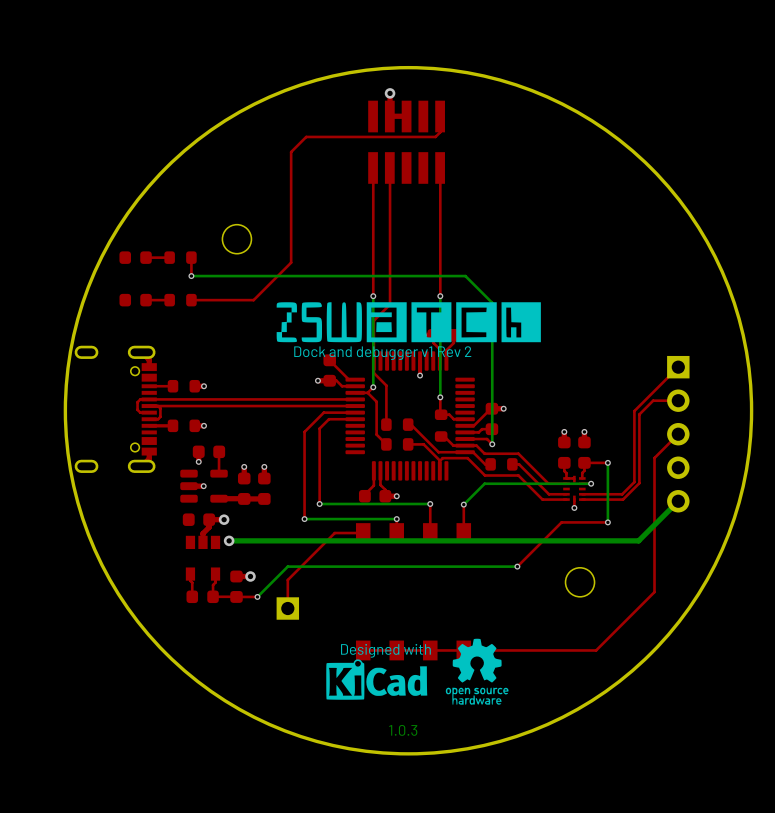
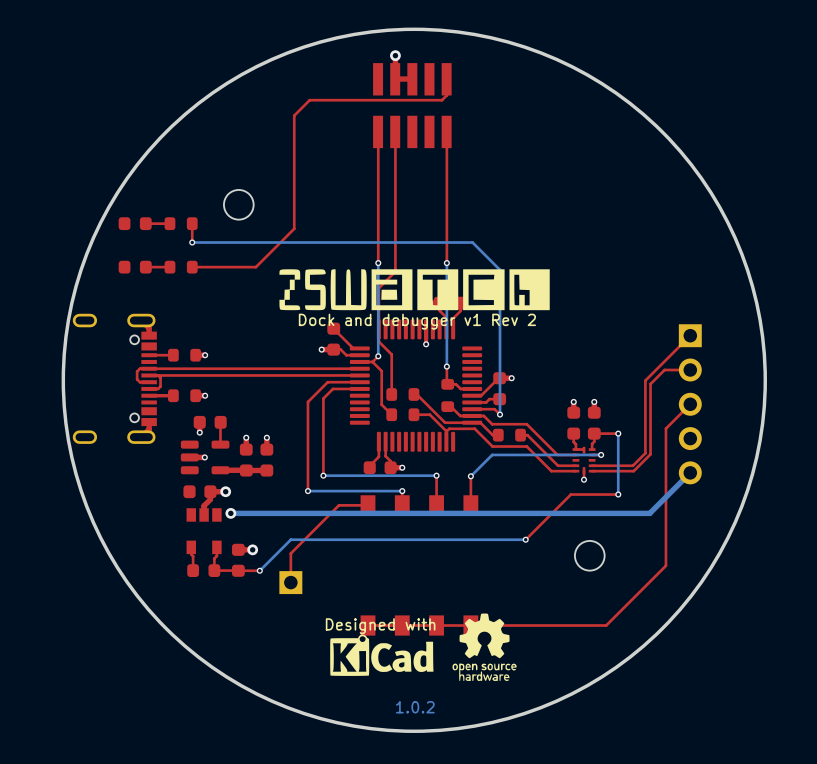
text: 1.0.3 (403, 730) -> 1.0.2 (415, 707)

